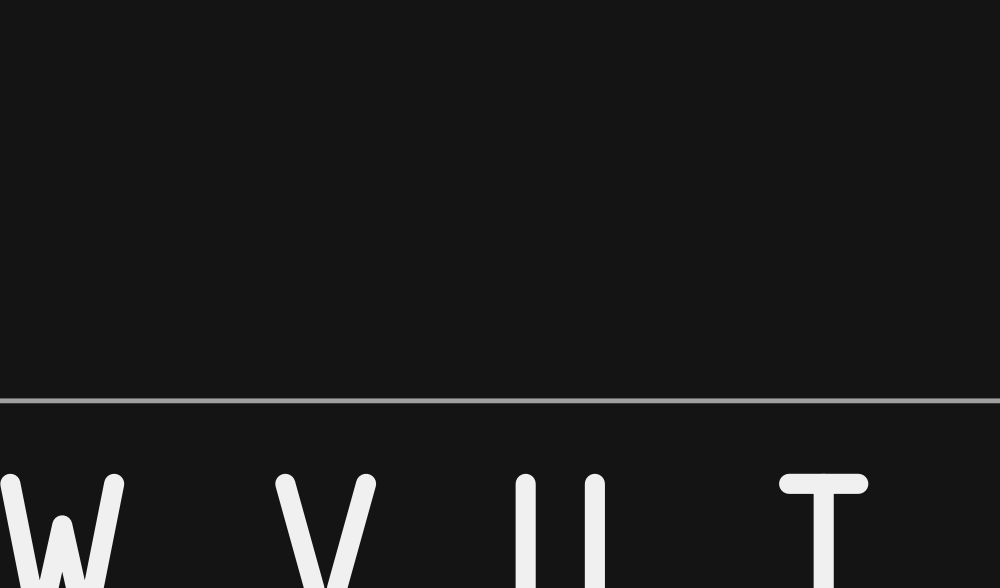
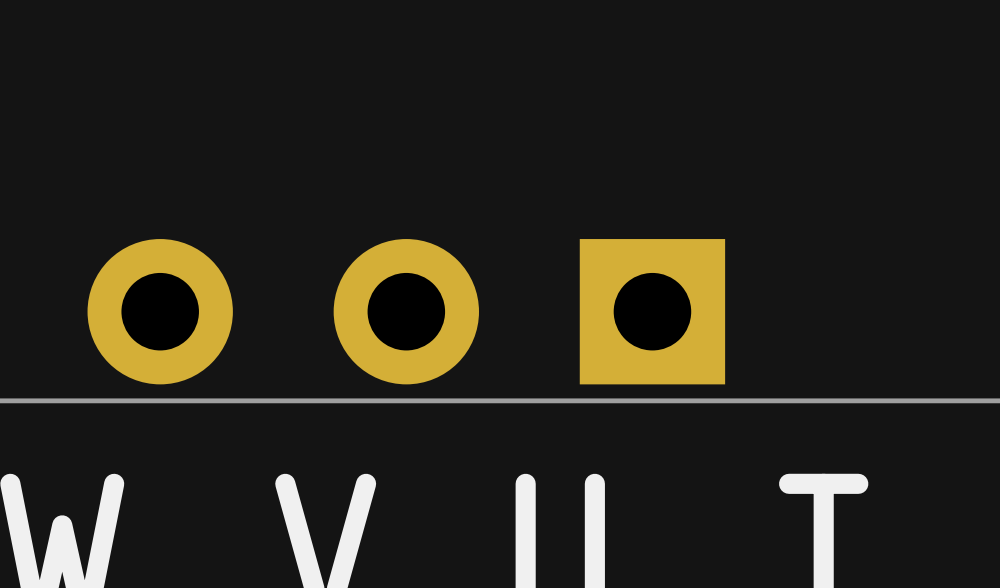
part: none -> (406, 311)

